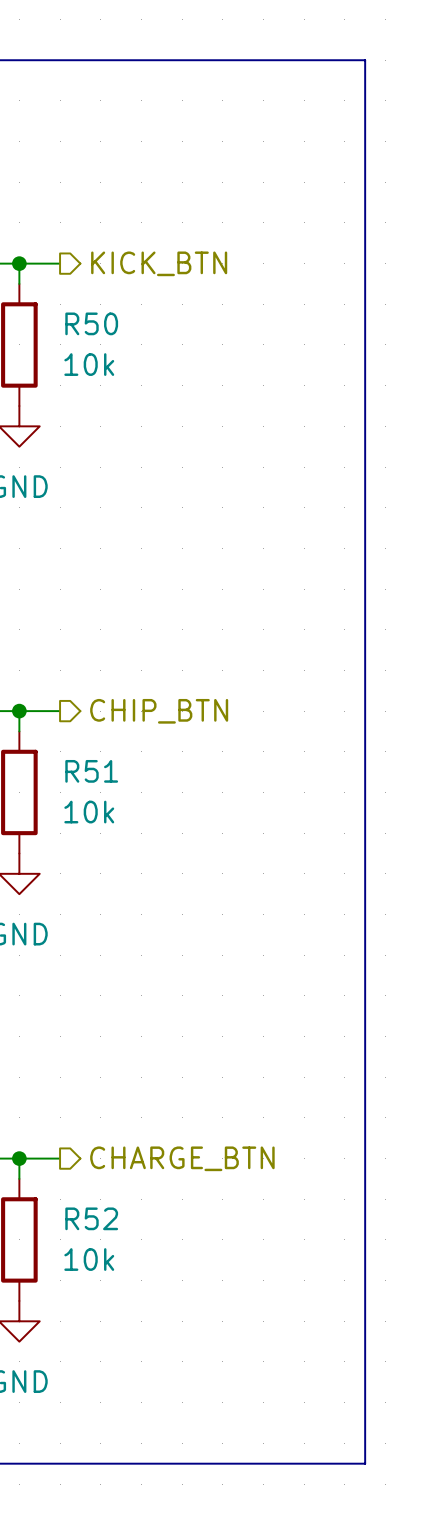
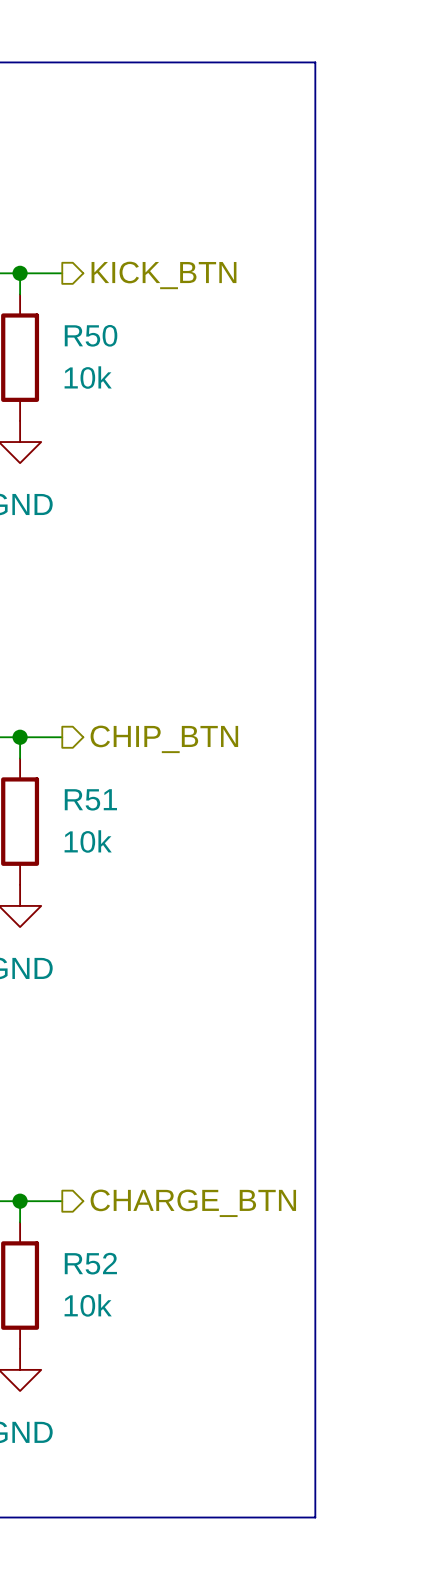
line: (304, 60) (365, 60) (365, 1463) (304, 1463) -> (315, 62) (315, 1517)

